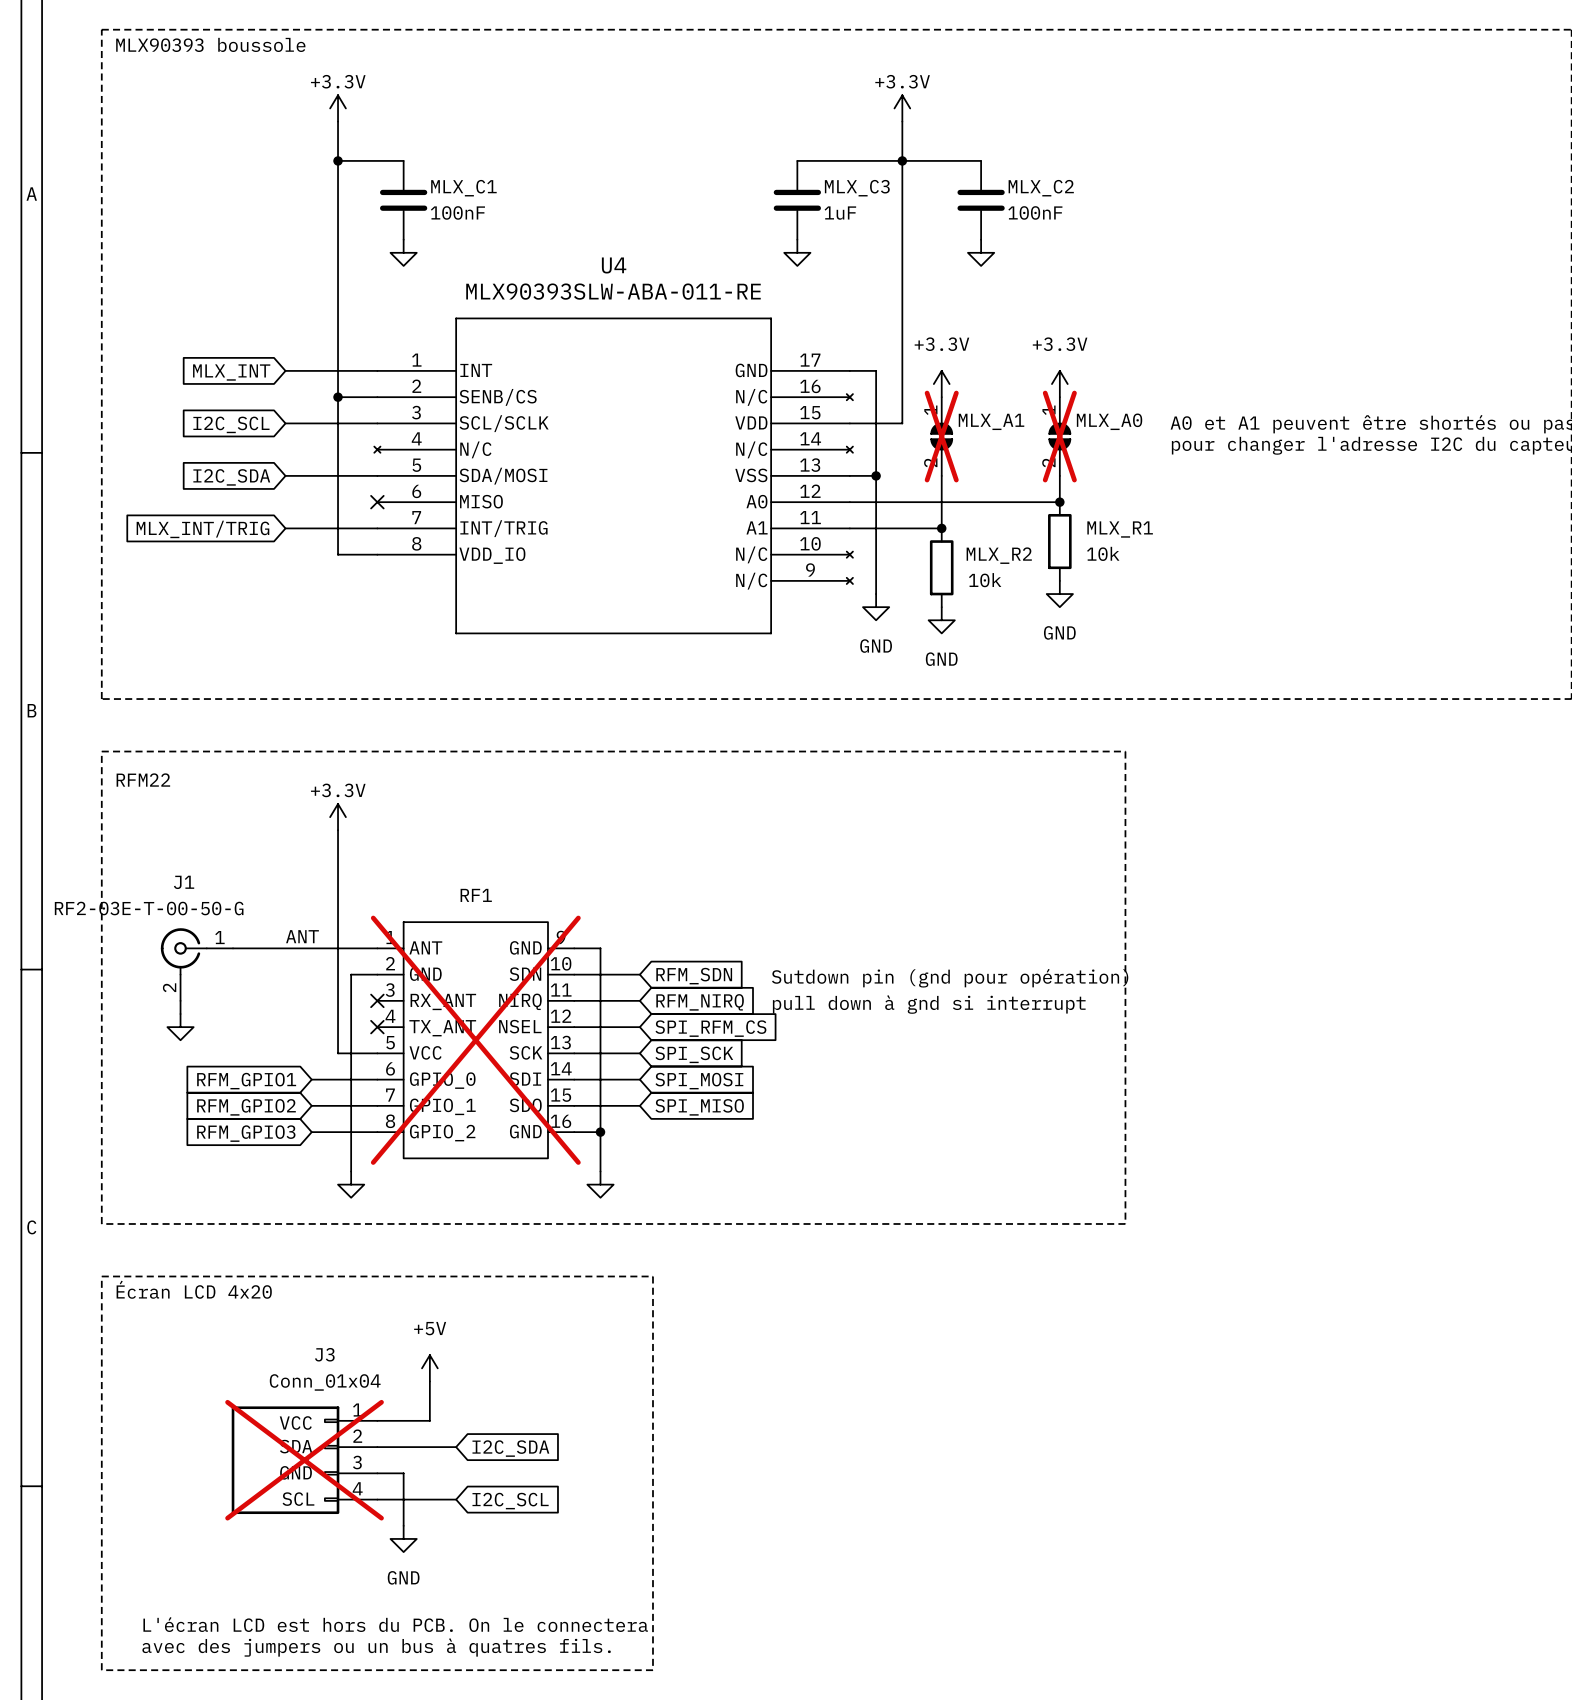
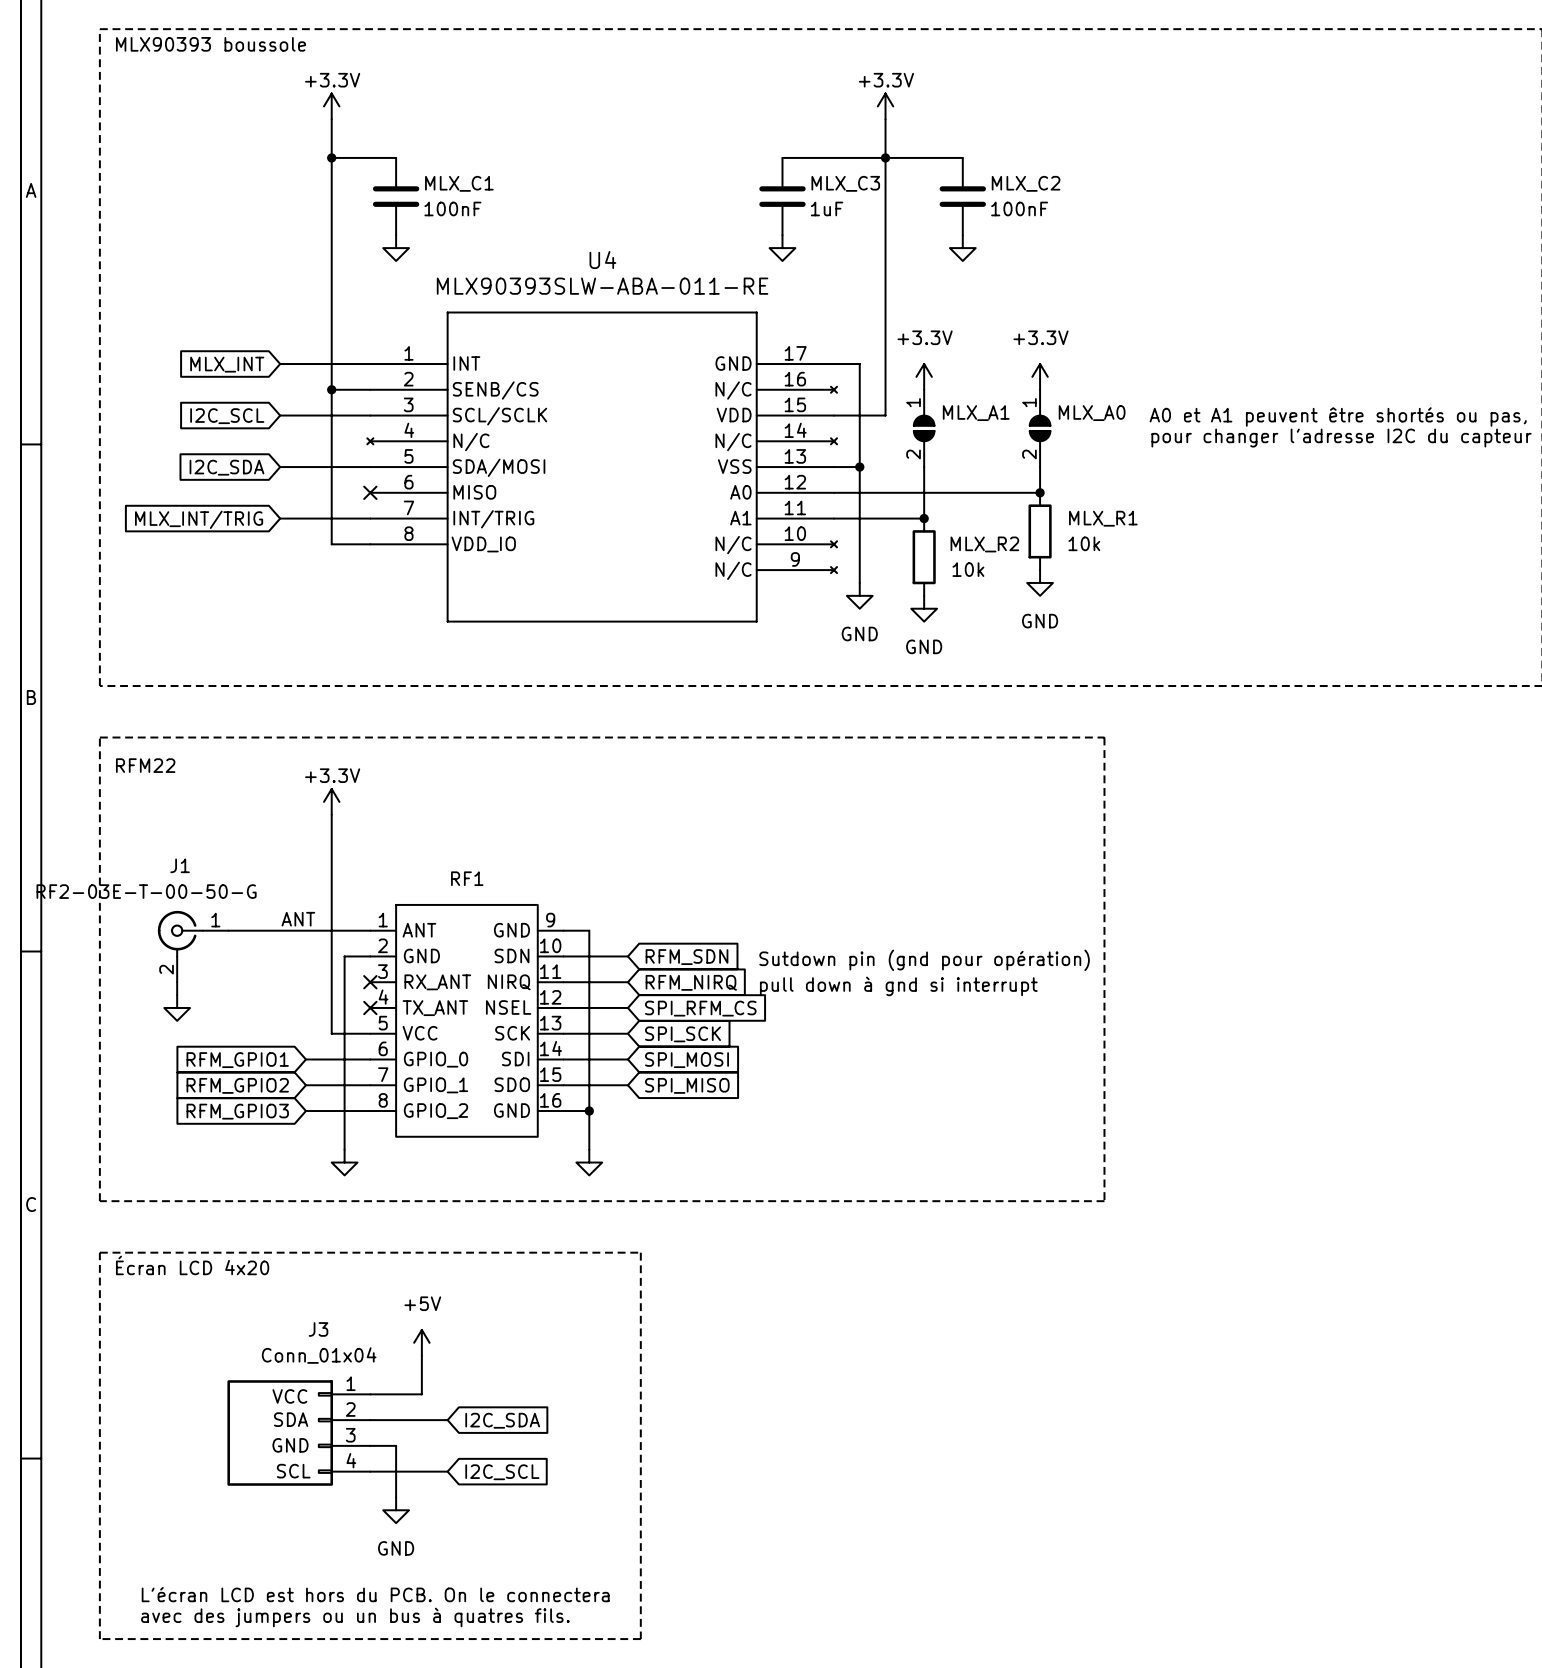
MLX_A1 do-not-place cross: (941, 436) -> none
MLX_A0 do-not-place cross: (1059, 436) -> none
RF1 do-not-place cross: (475, 1040) -> none
J3 do-not-place cross: (304, 1460) -> none

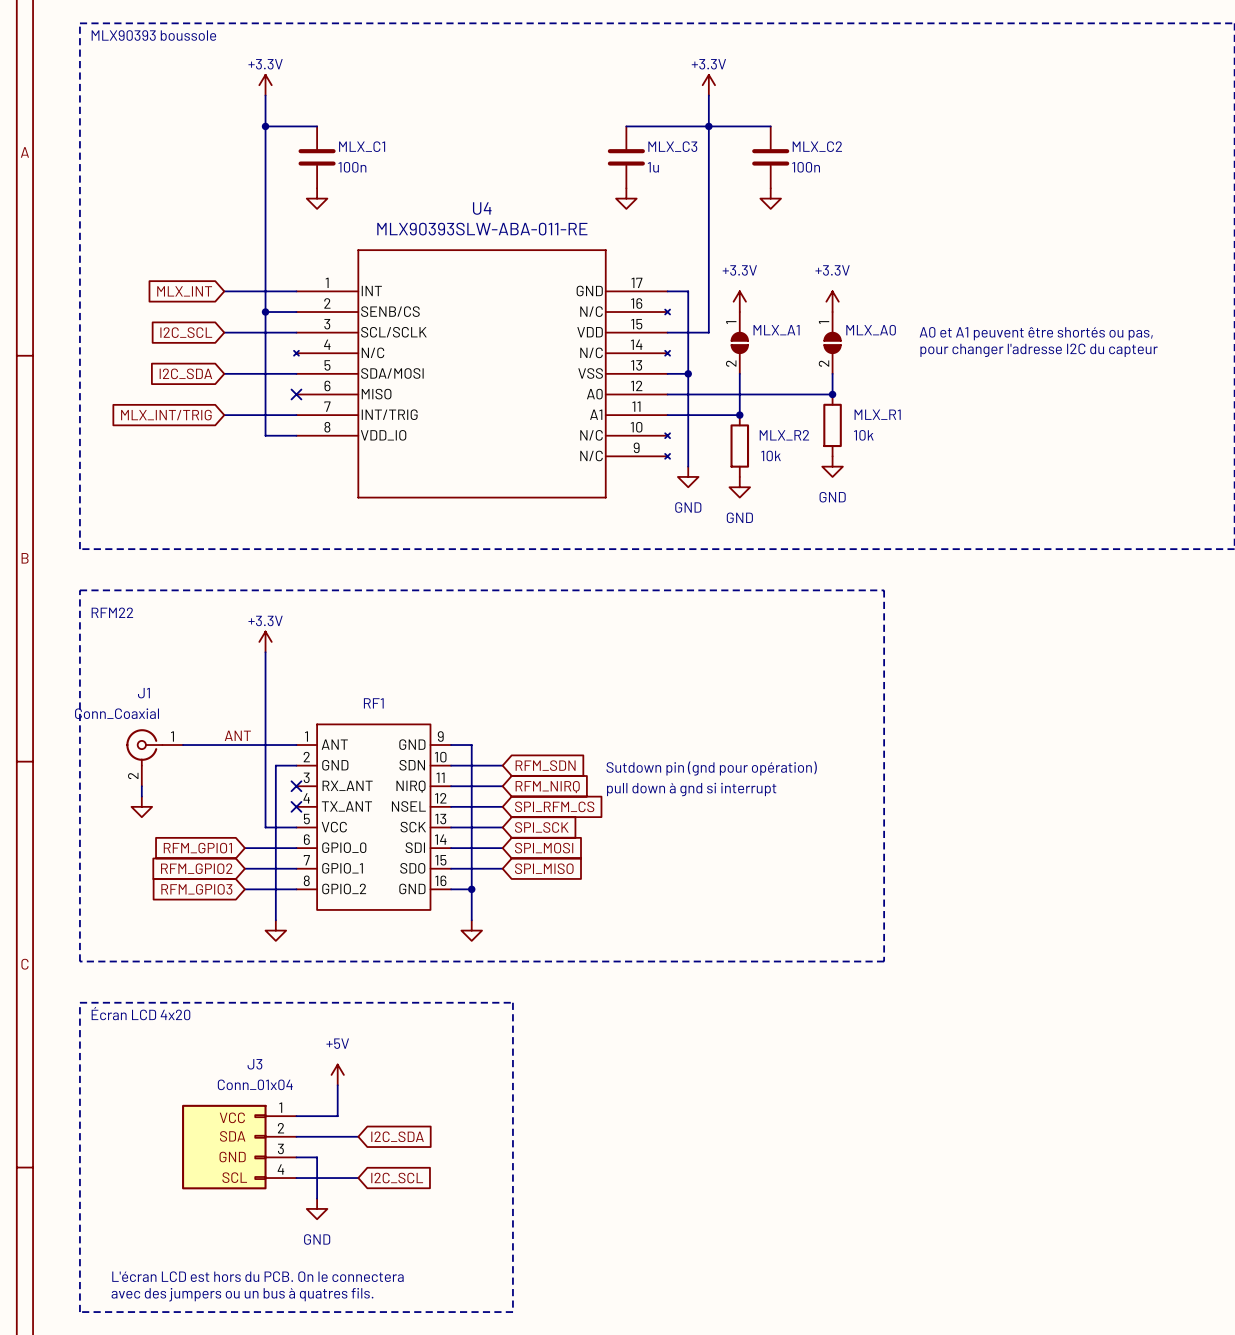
MLX_C1 value: 100nF (452, 208) -> 100n (352, 167)
MLX_C3 value: 1uF (827, 208) -> 1u (653, 167)
MLX_C2 value: 100nF (1019, 208) -> 100n (806, 167)
J1 value: RF2-03E-T-00-50-G (146, 891) -> Conn_Coaxial (117, 713)

